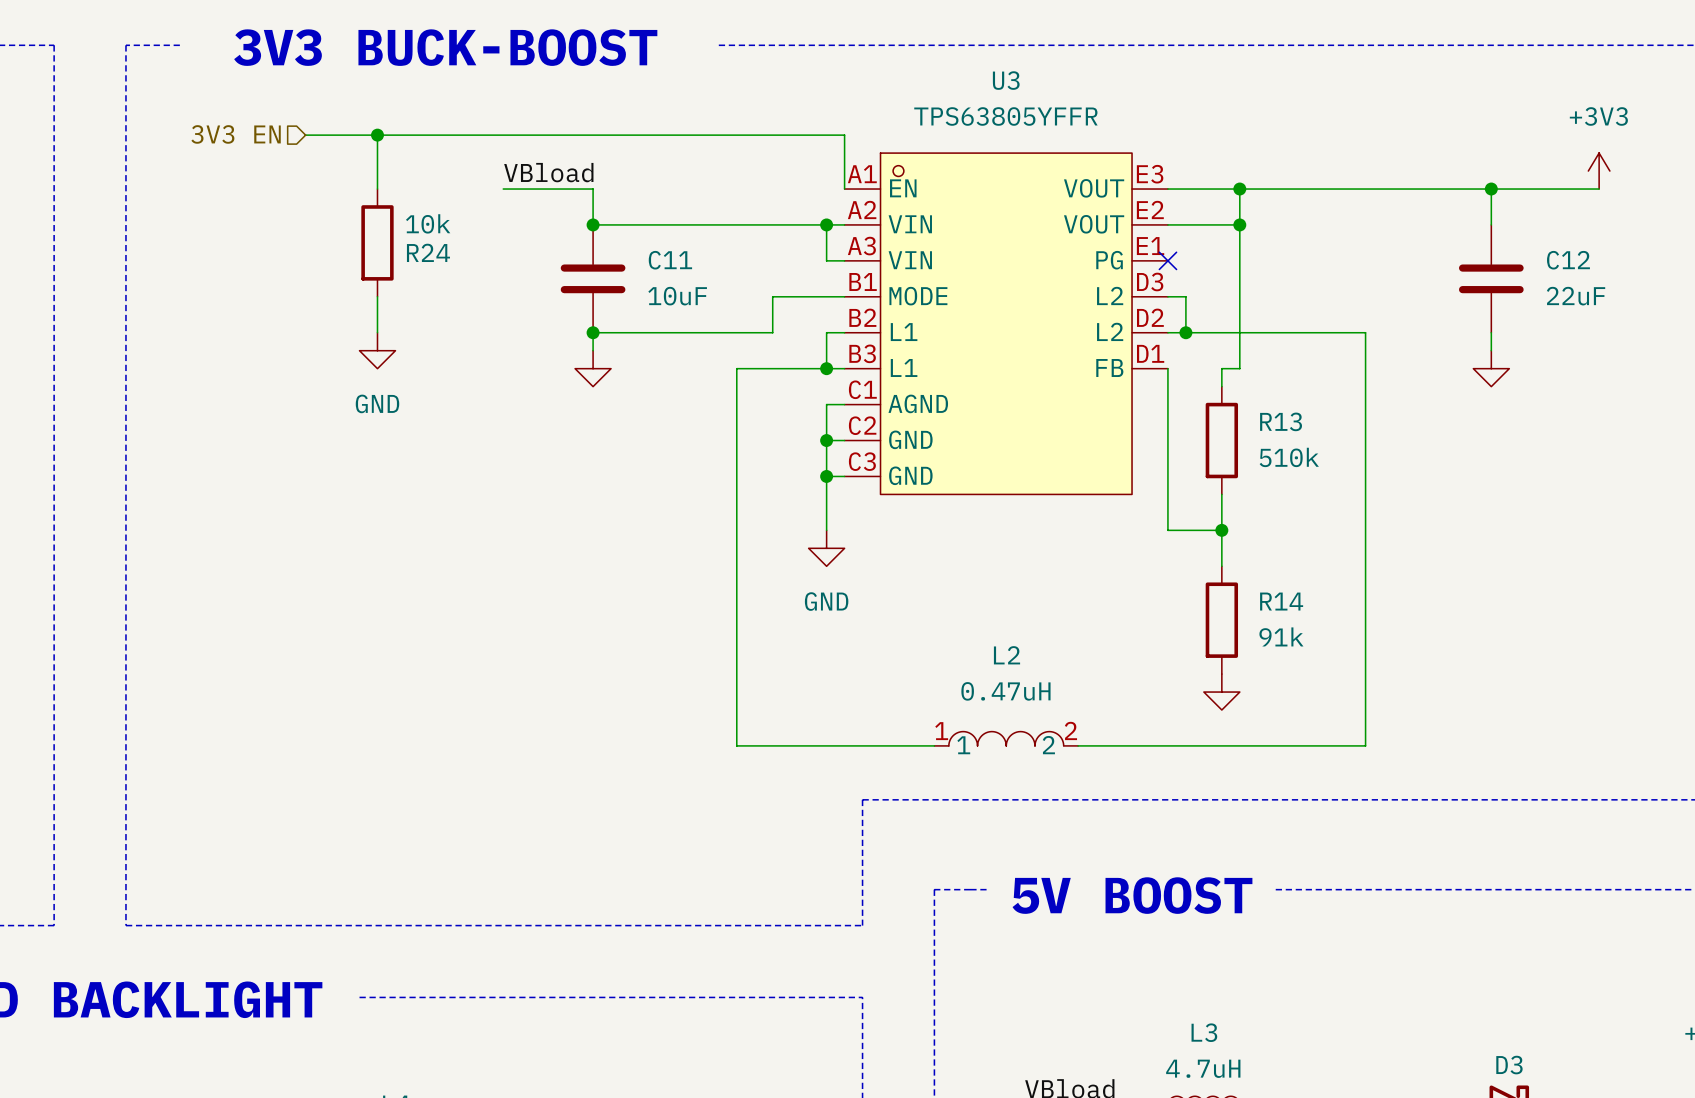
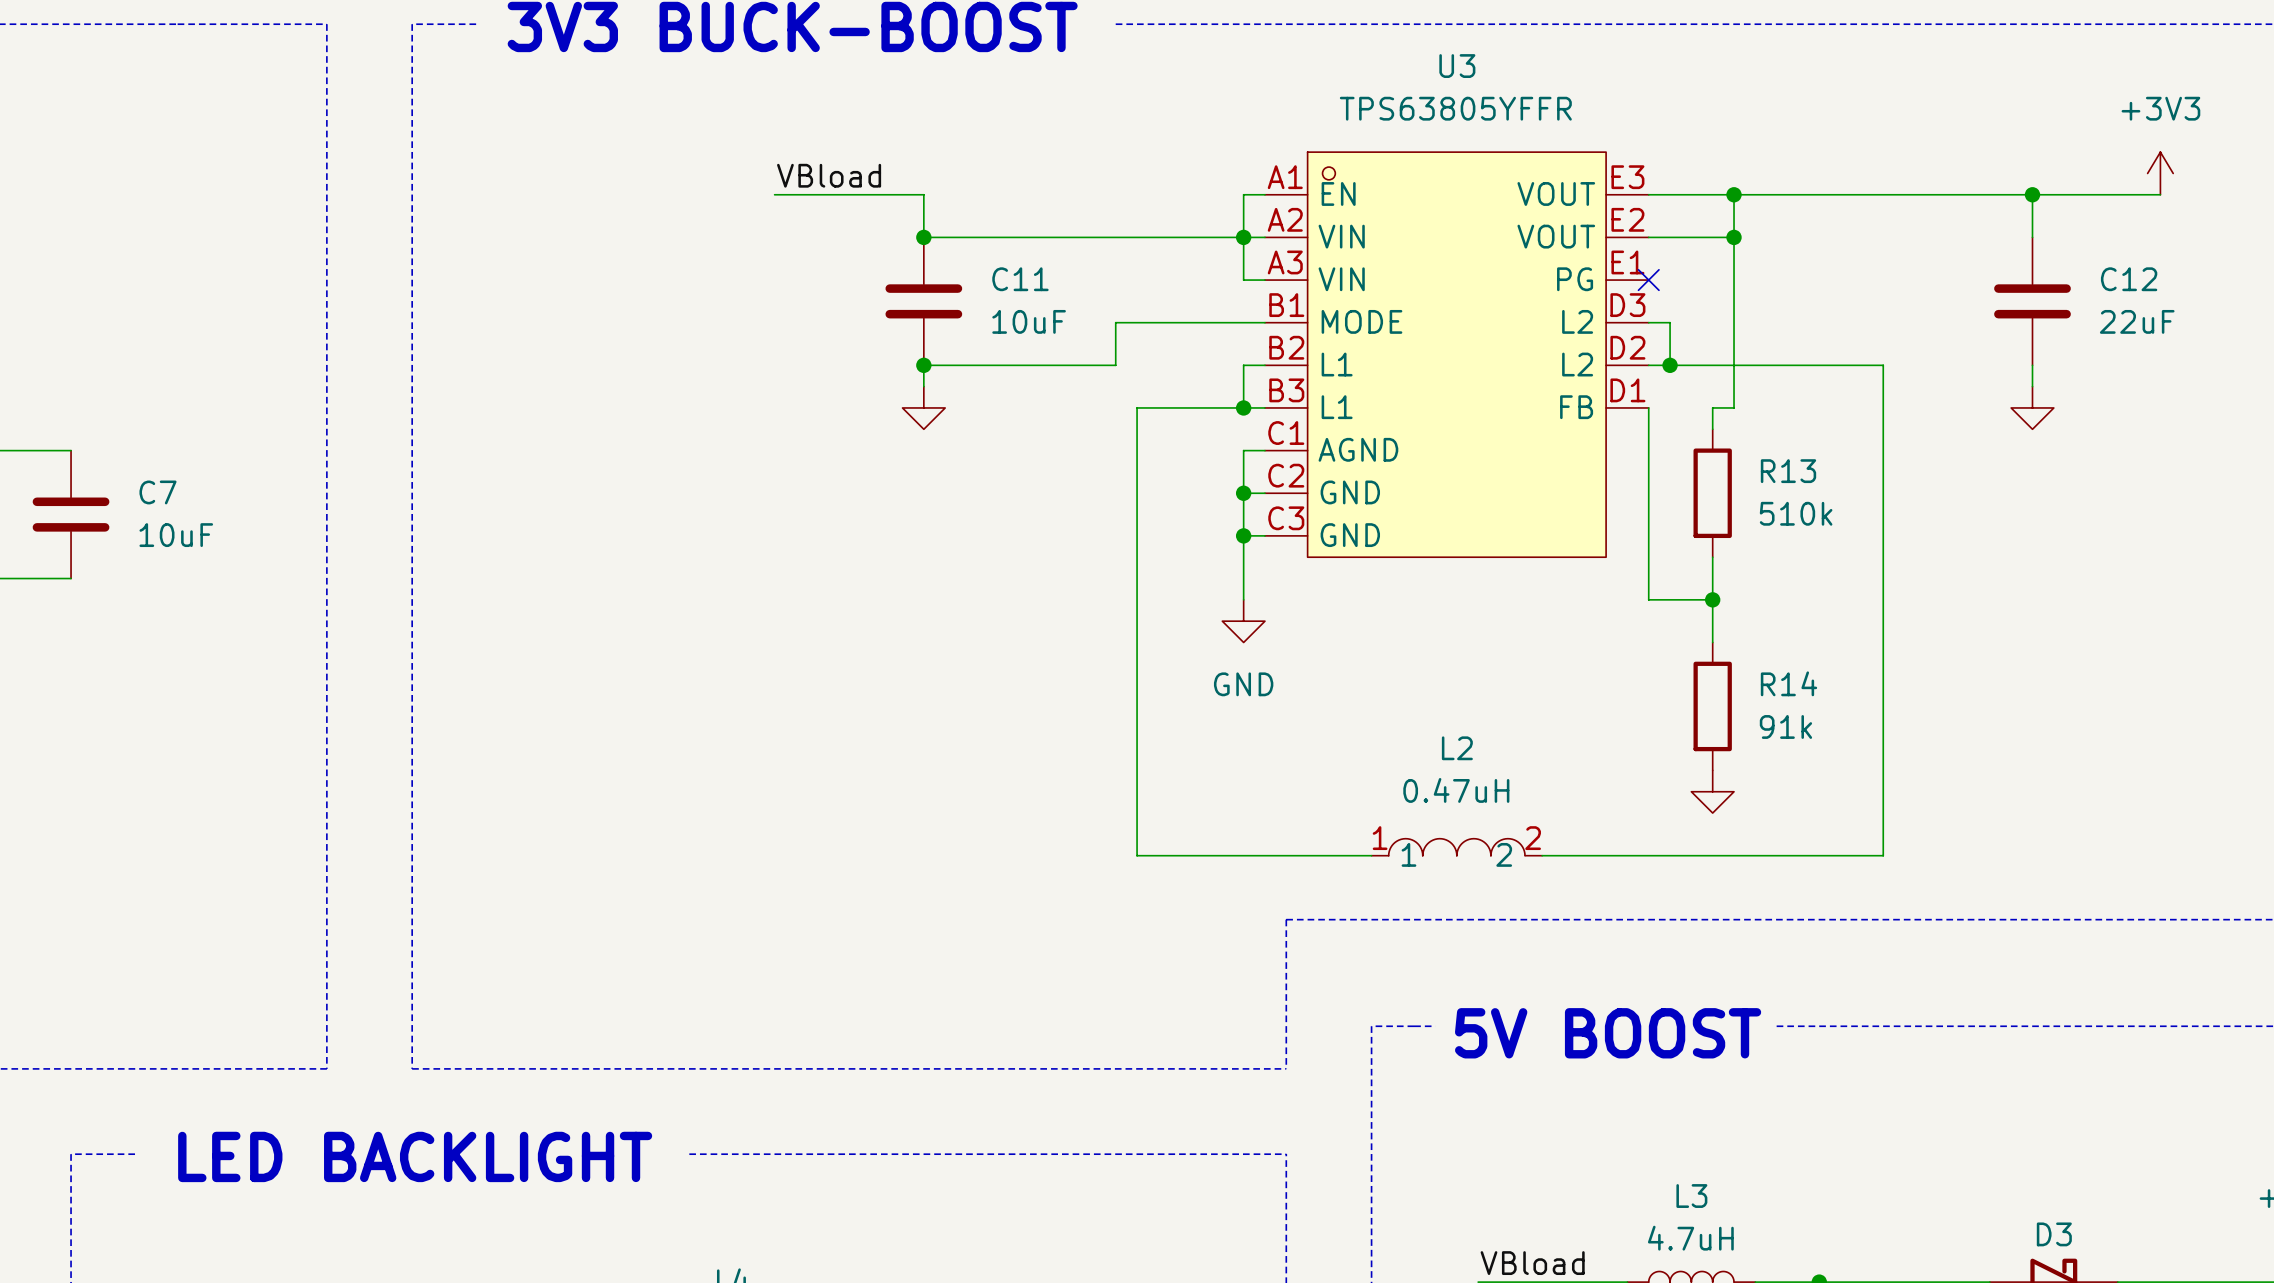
hierarchical label: 3V3 EN (236, 134) -> none
wire: (305, 135) (844, 135) (844, 189) -> (1243, 237) (1243, 194) (1264, 194)
wire: (377, 135) (377, 189) -> none
junction: (377, 135) -> none
label position: VBload (548, 172) -> VBload (829, 175)
wire: none -> (774, 194) (859, 194)
wire: (557, 189) (593, 189) (593, 224) -> (923, 194) (923, 237) (966, 237)
junction position: (593, 224) -> (923, 237)
R24: 10k (377, 242) -> none
C11 position: (593, 278) -> (923, 301)
wire: (377, 296) (377, 332) -> none
wire: (772, 296) (772, 332) (718, 332) -> (1179, 322) (1115, 322) (1115, 365)
wire: (593, 332) (593, 350) -> (966, 365) (923, 365) (923, 386)
junction position: (593, 332) -> (923, 365)
power symbol: GND (377, 350) -> none
power symbol position: (593, 368) -> (923, 407)

